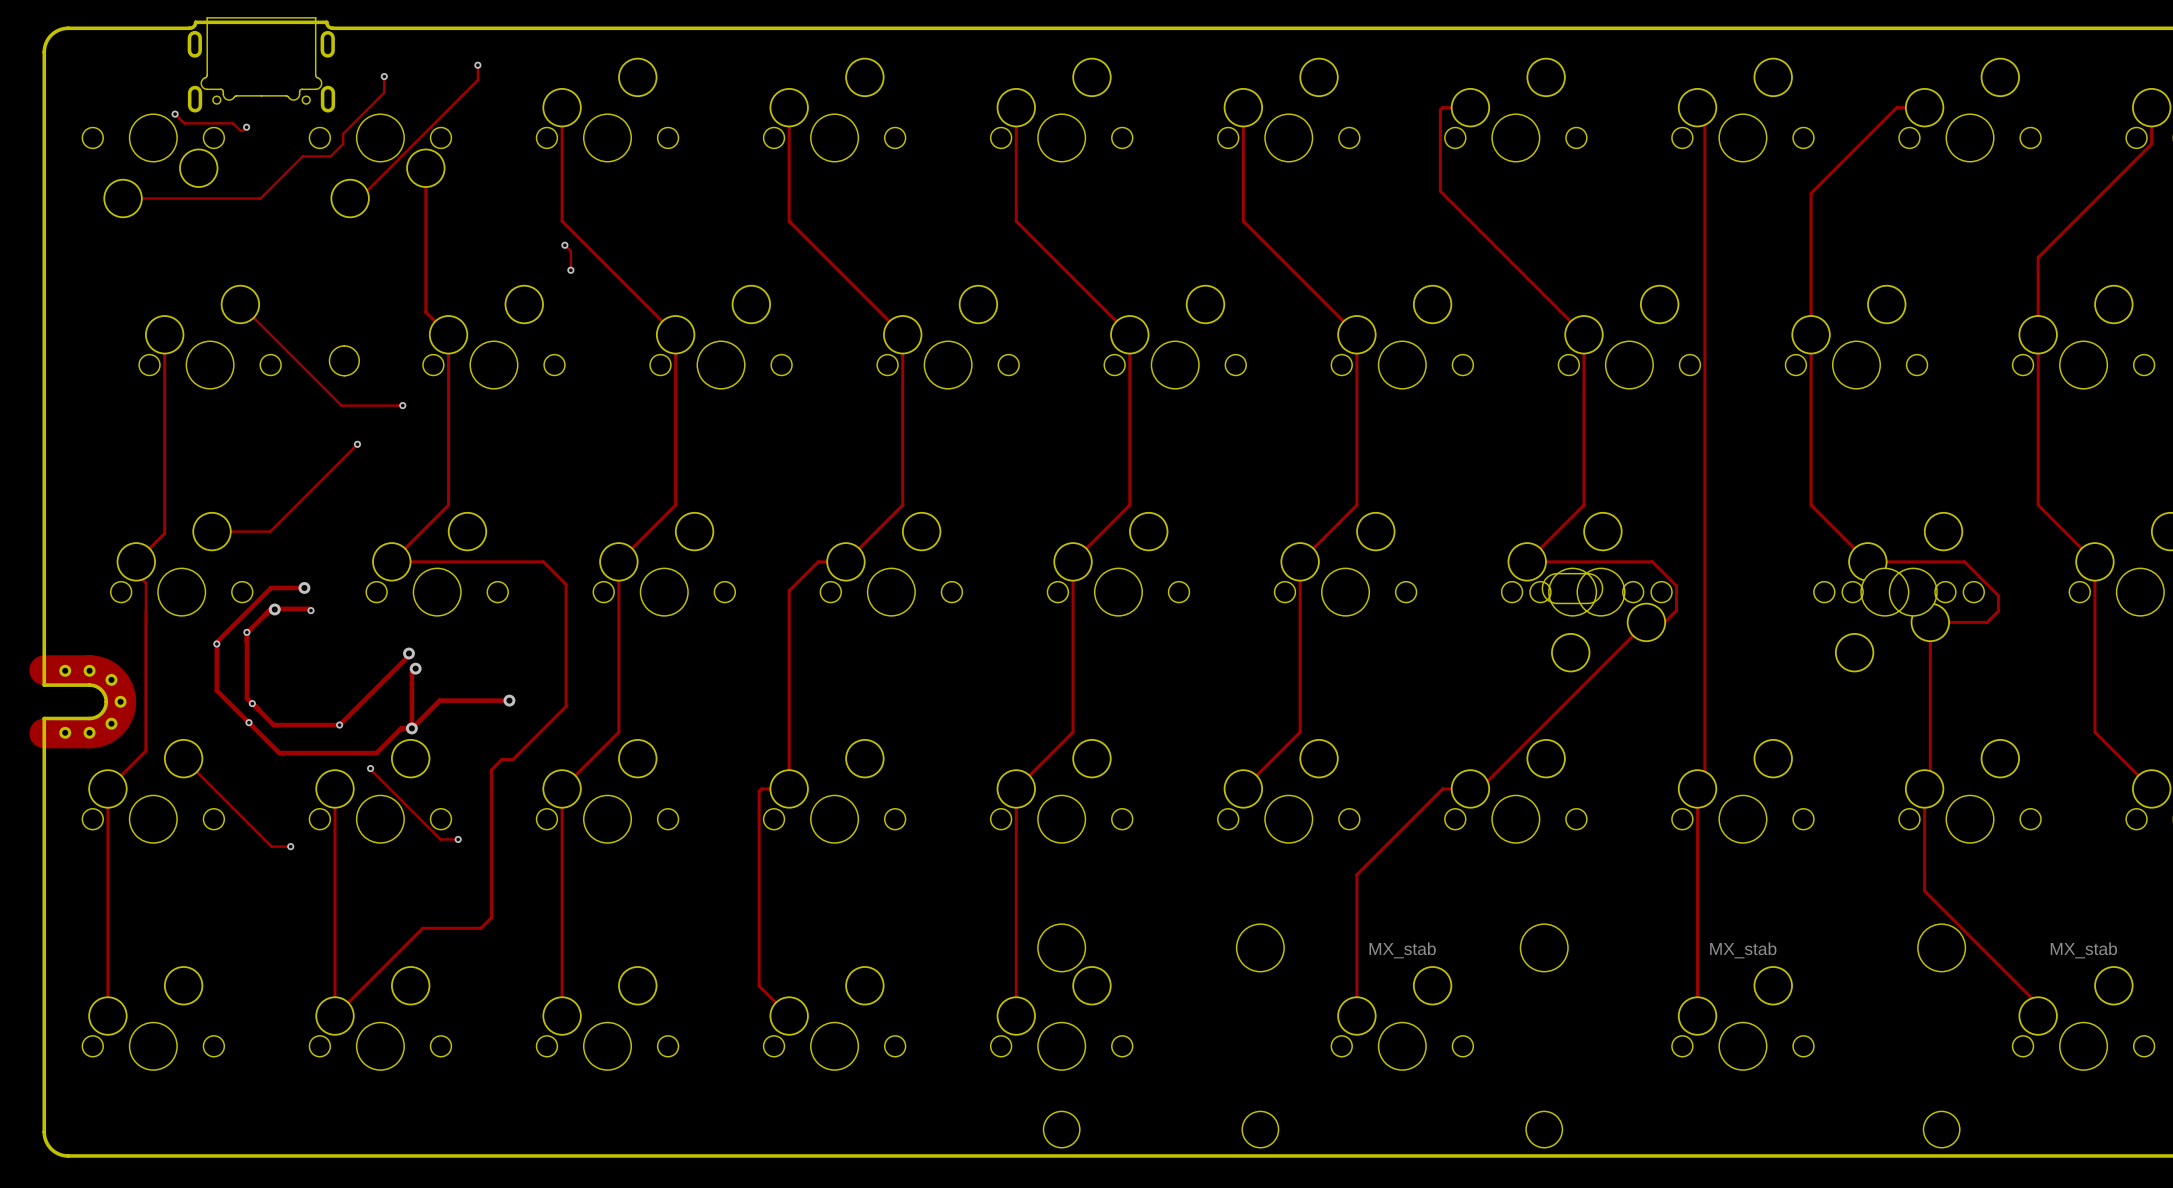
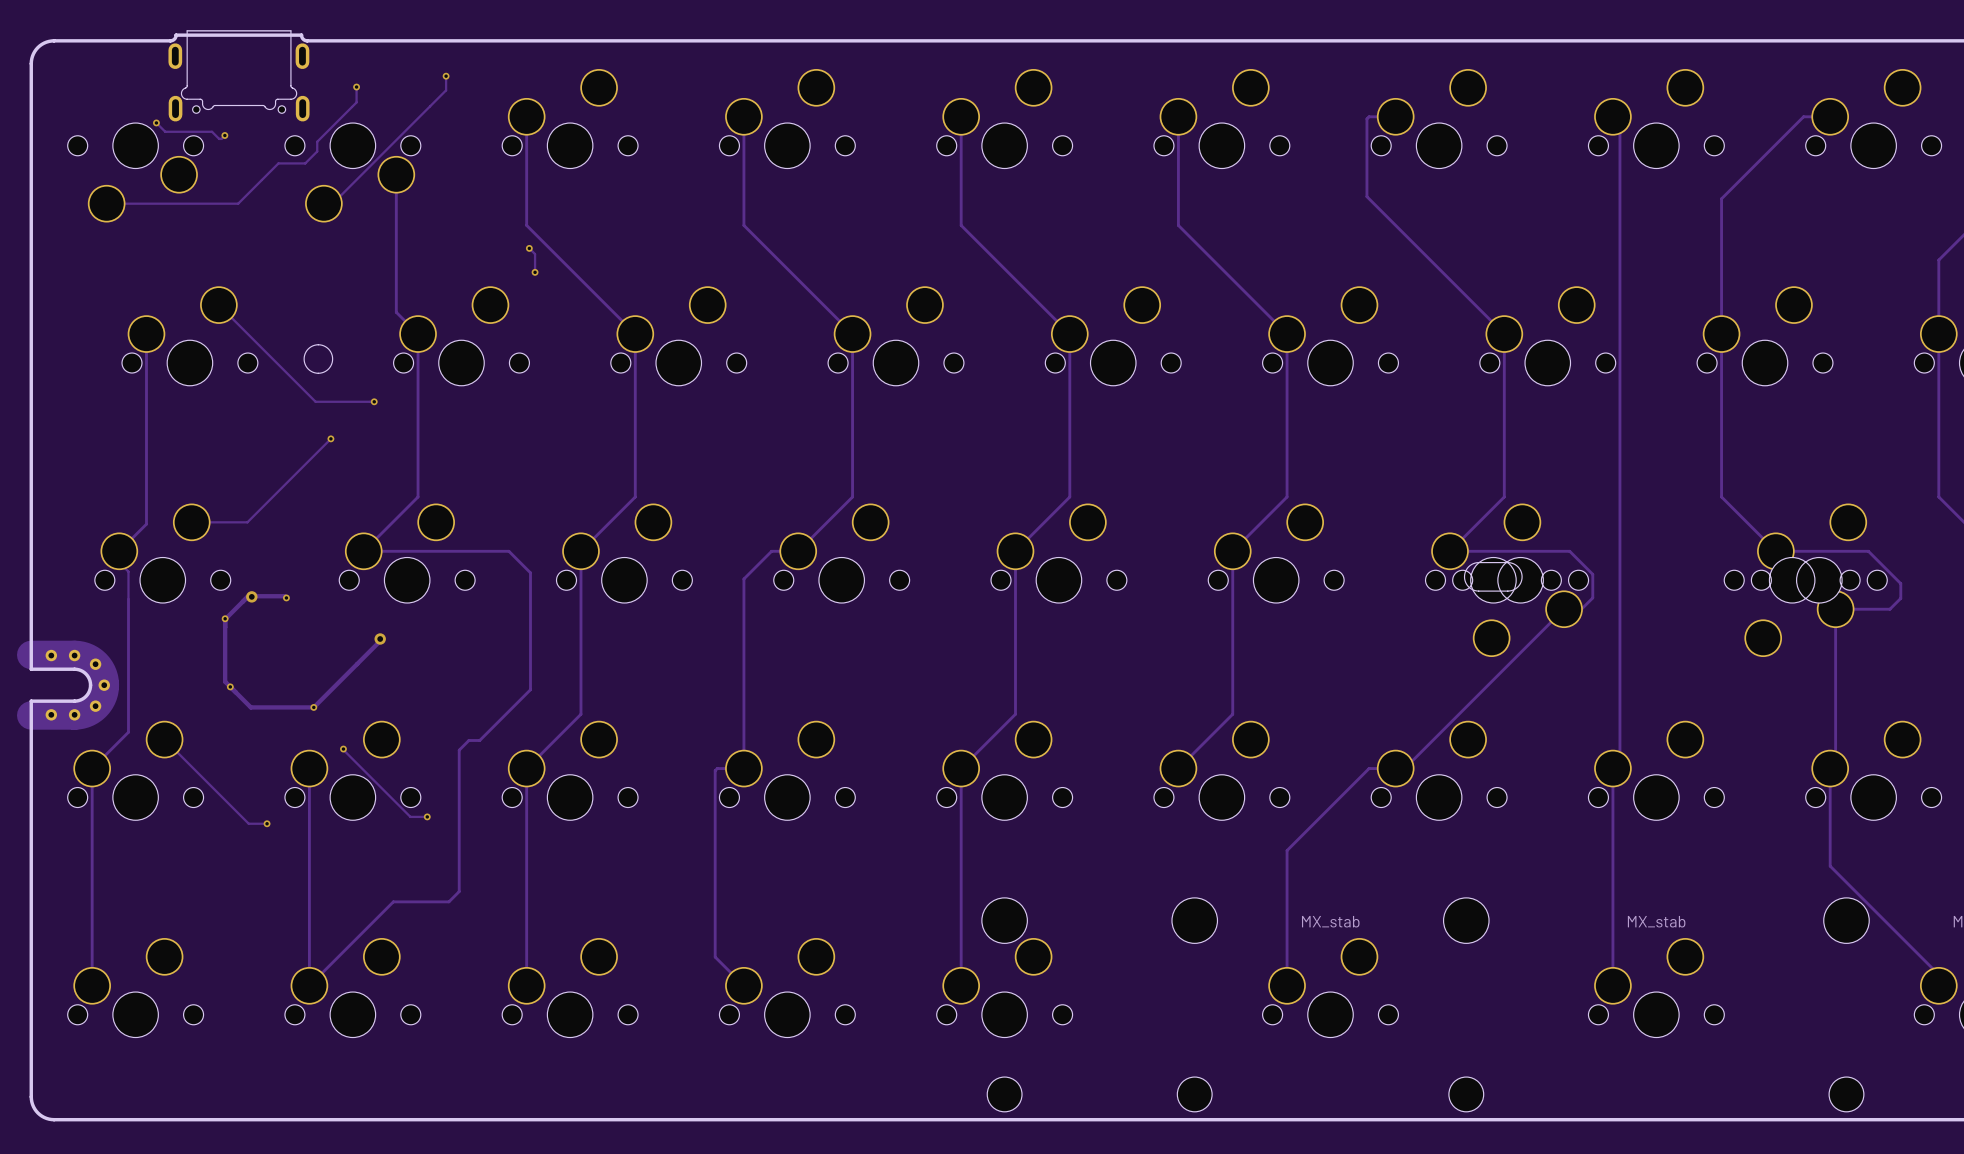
track: (304, 587) (271, 587) (216, 642) (216, 690) (279, 753) (376, 753) (401, 728) (411, 728) -> none
via: (304, 587) -> none
via: (216, 643) -> none
track: (415, 668) (411, 672) (411, 728) -> none
via: (415, 668) -> none
track: (509, 700) (439, 700) (411, 728) -> none
via: (509, 700) -> none
via: (248, 722) -> none
via: (411, 728) -> none

